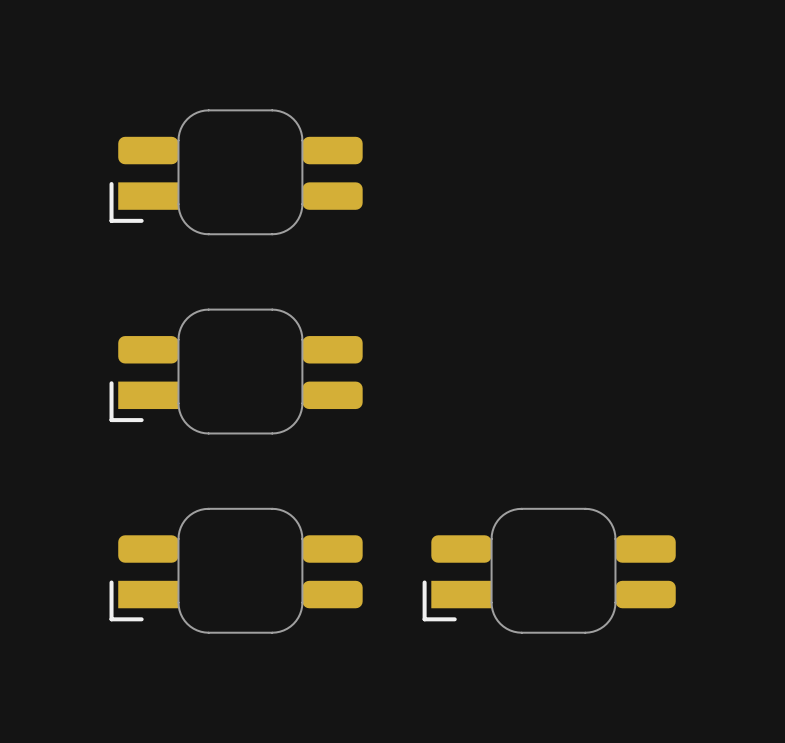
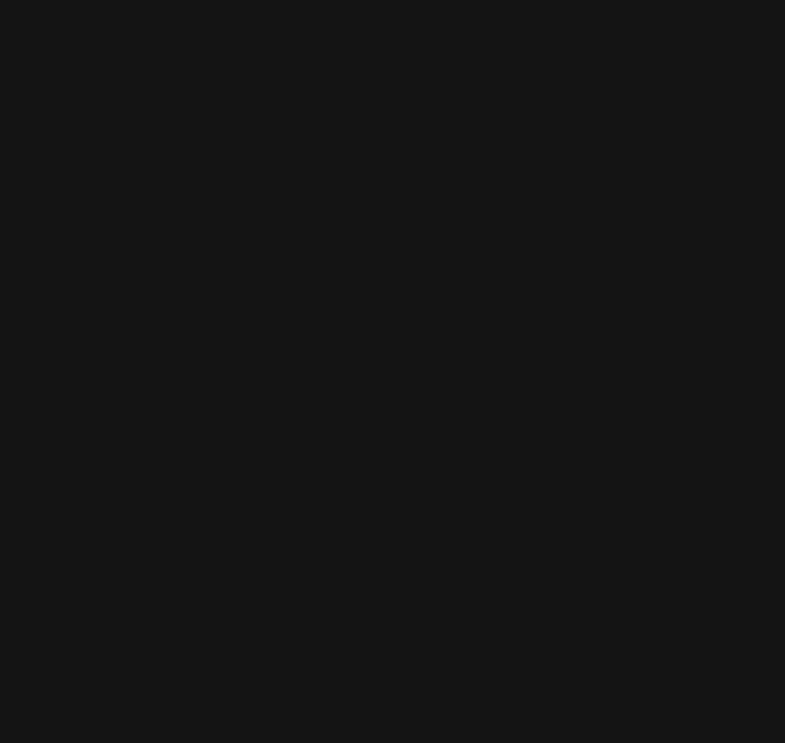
part: (236, 172) -> none
part: (236, 371) -> none
part: (236, 570) -> none
part: (549, 570) -> none

